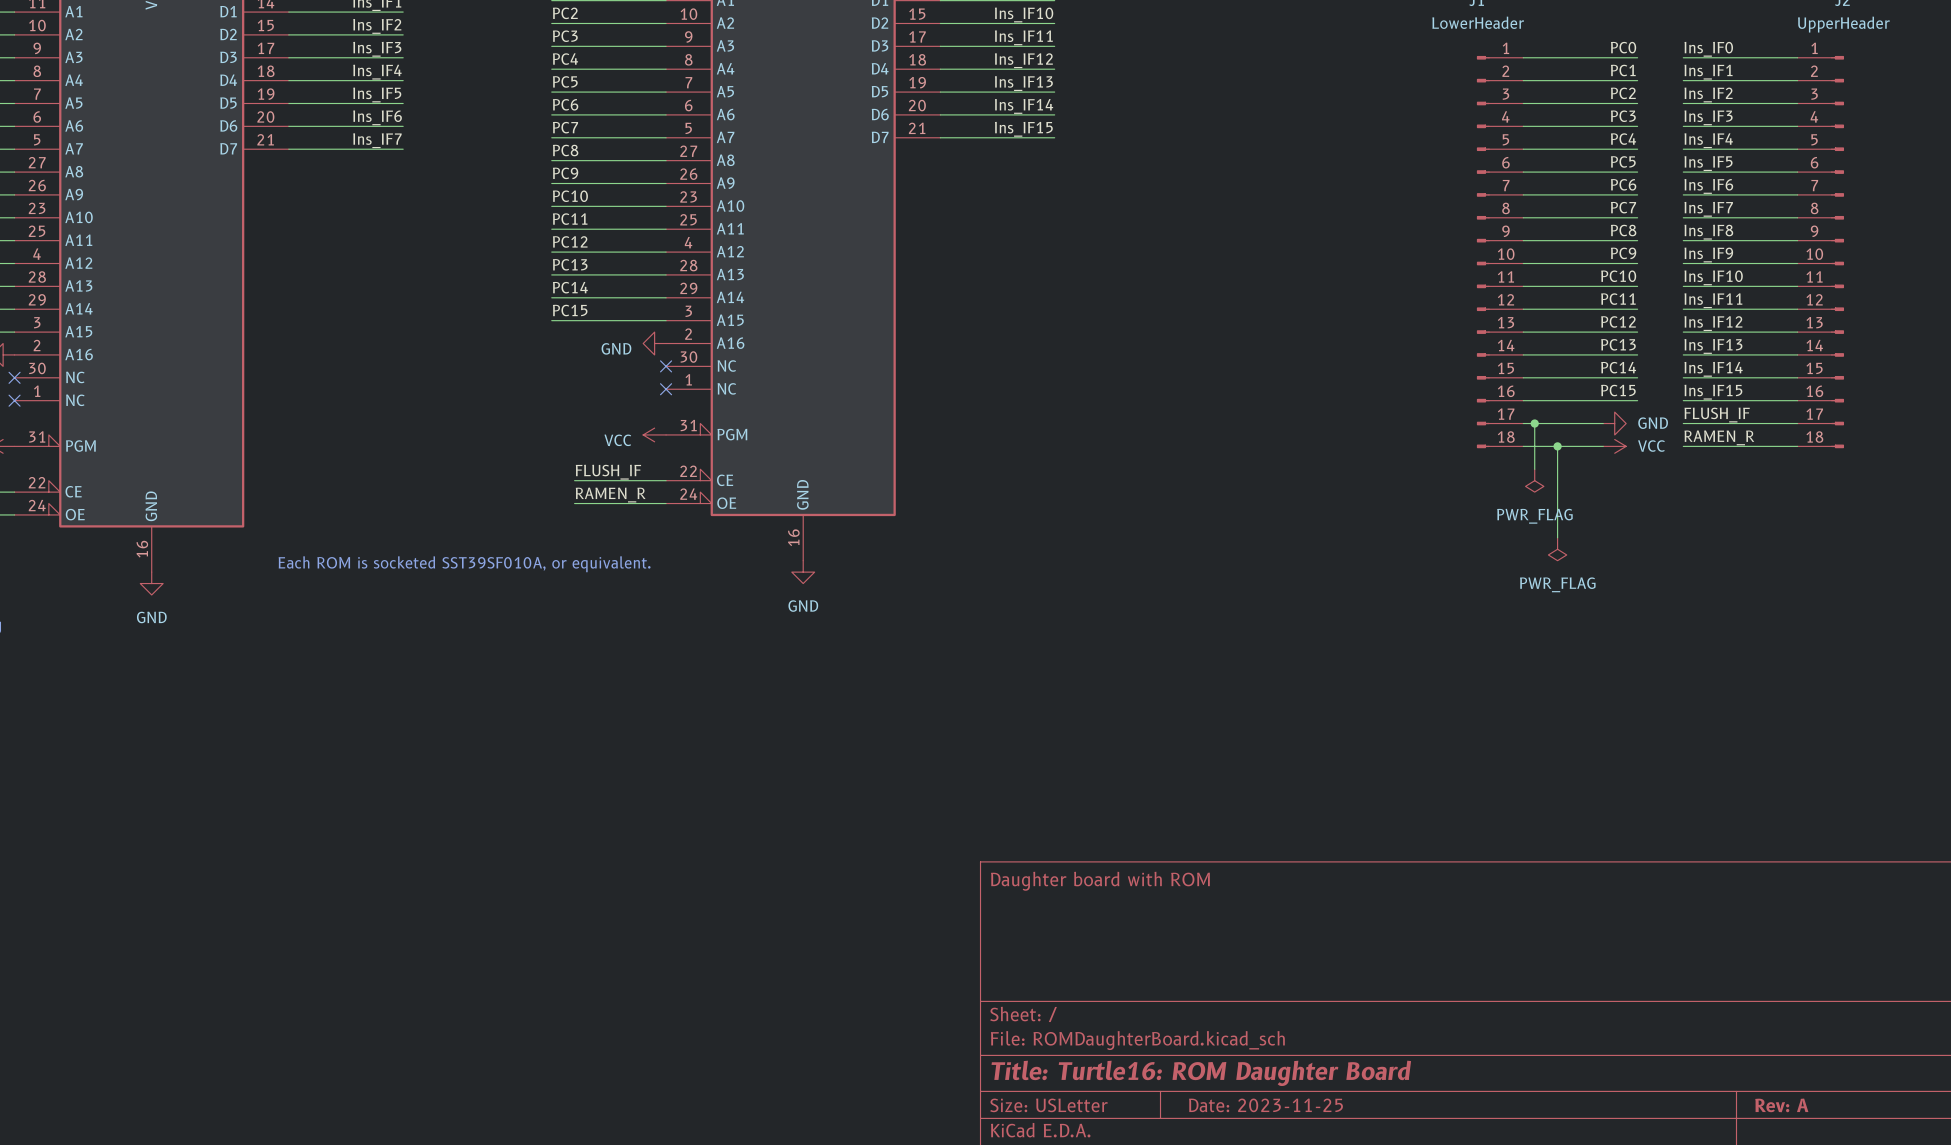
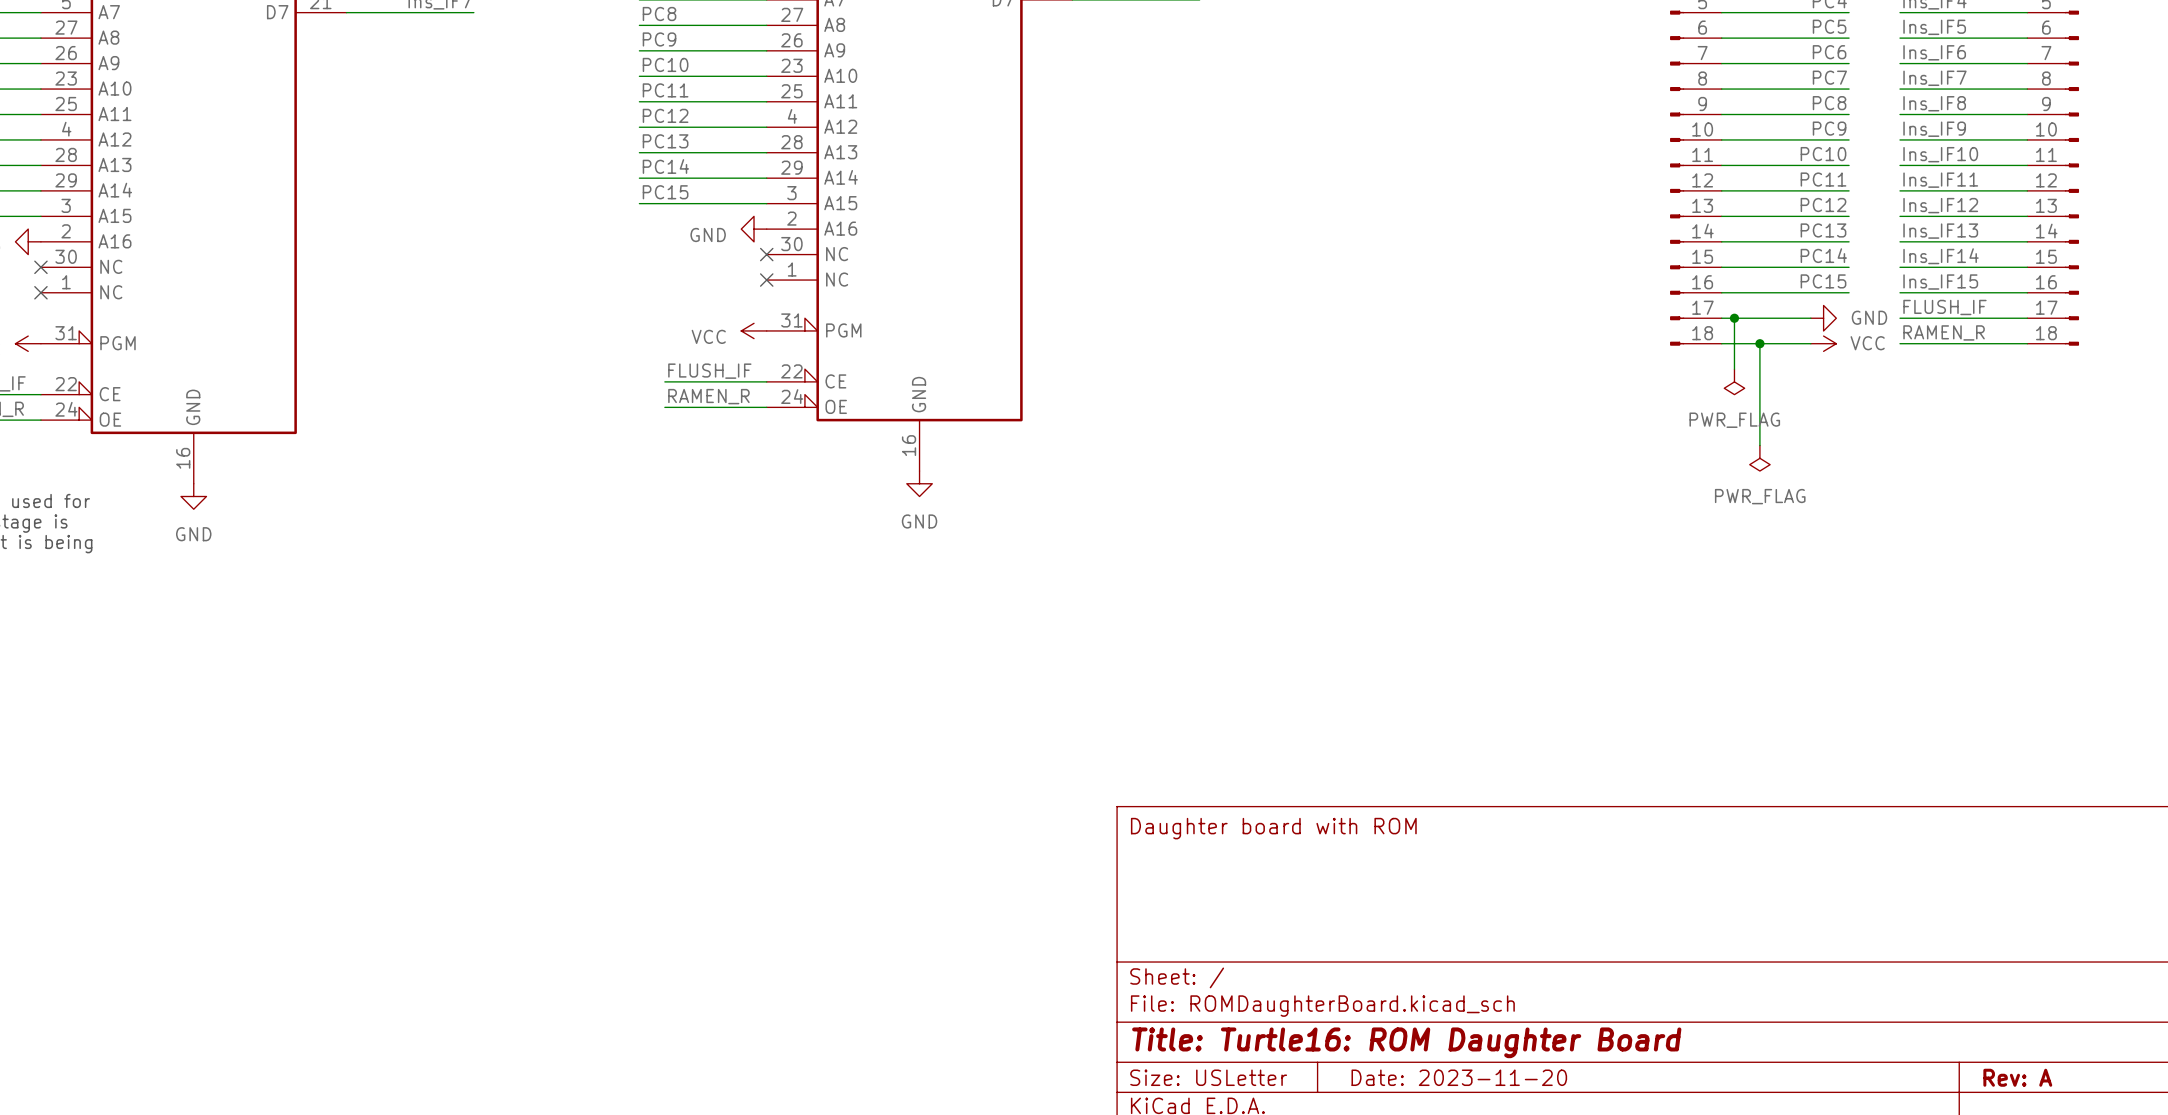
text: Each ROM is socketed SST39SF010A, or equivalent. (464, 564) -> none
title block: Date: 2023-11-25 (1265, 1105) -> Date: 2023-11-20 (1459, 1077)

